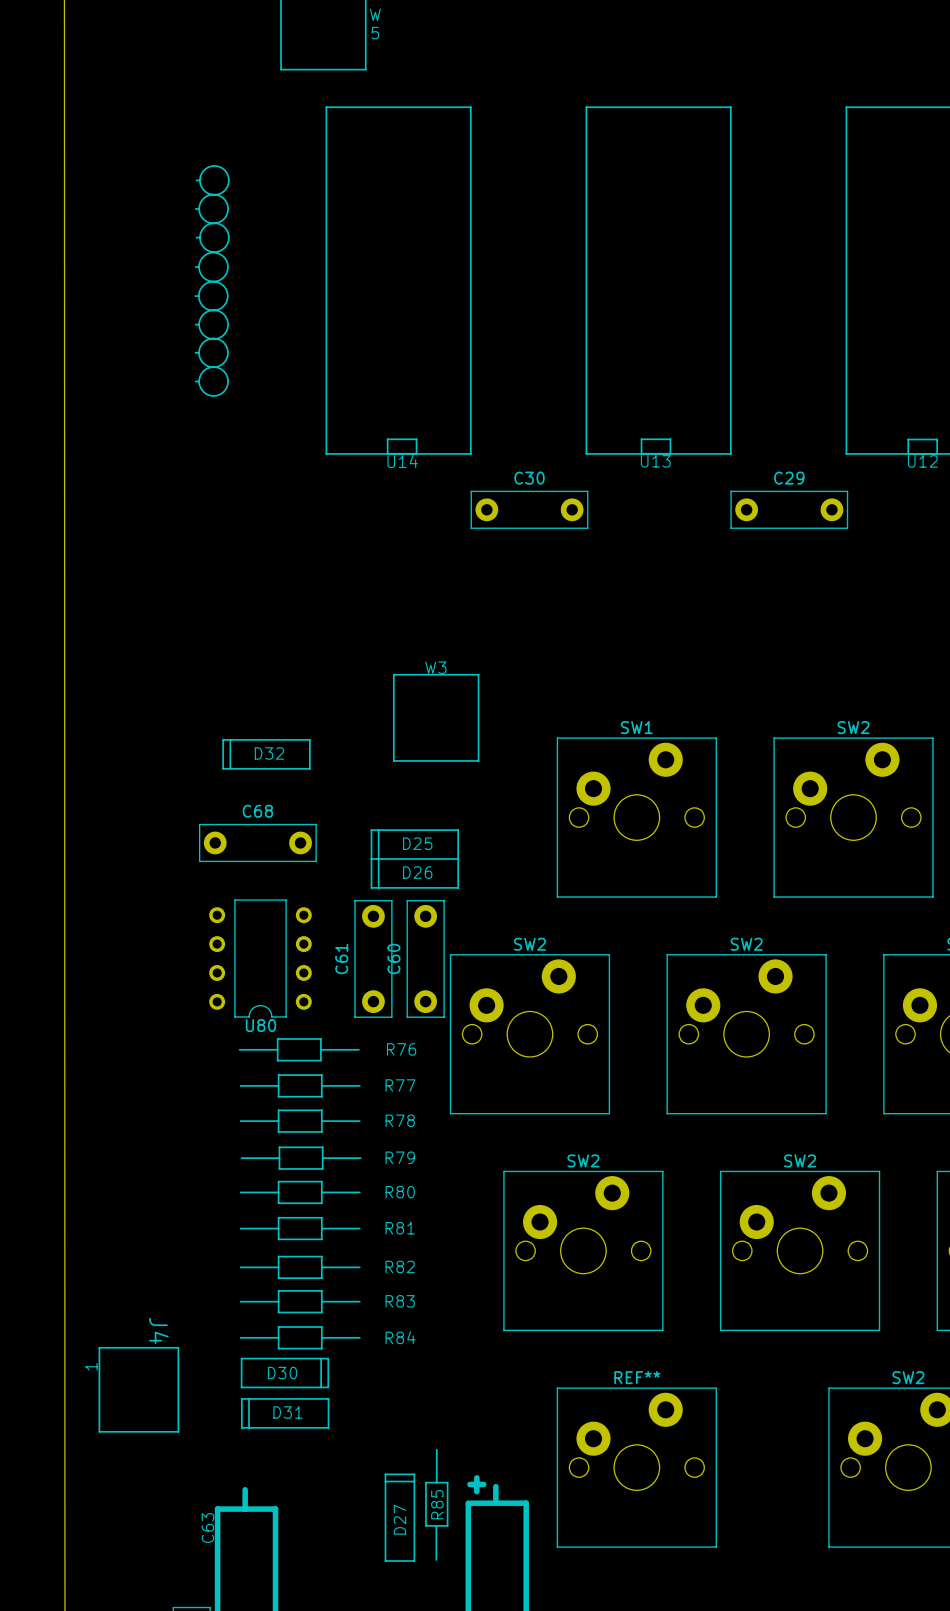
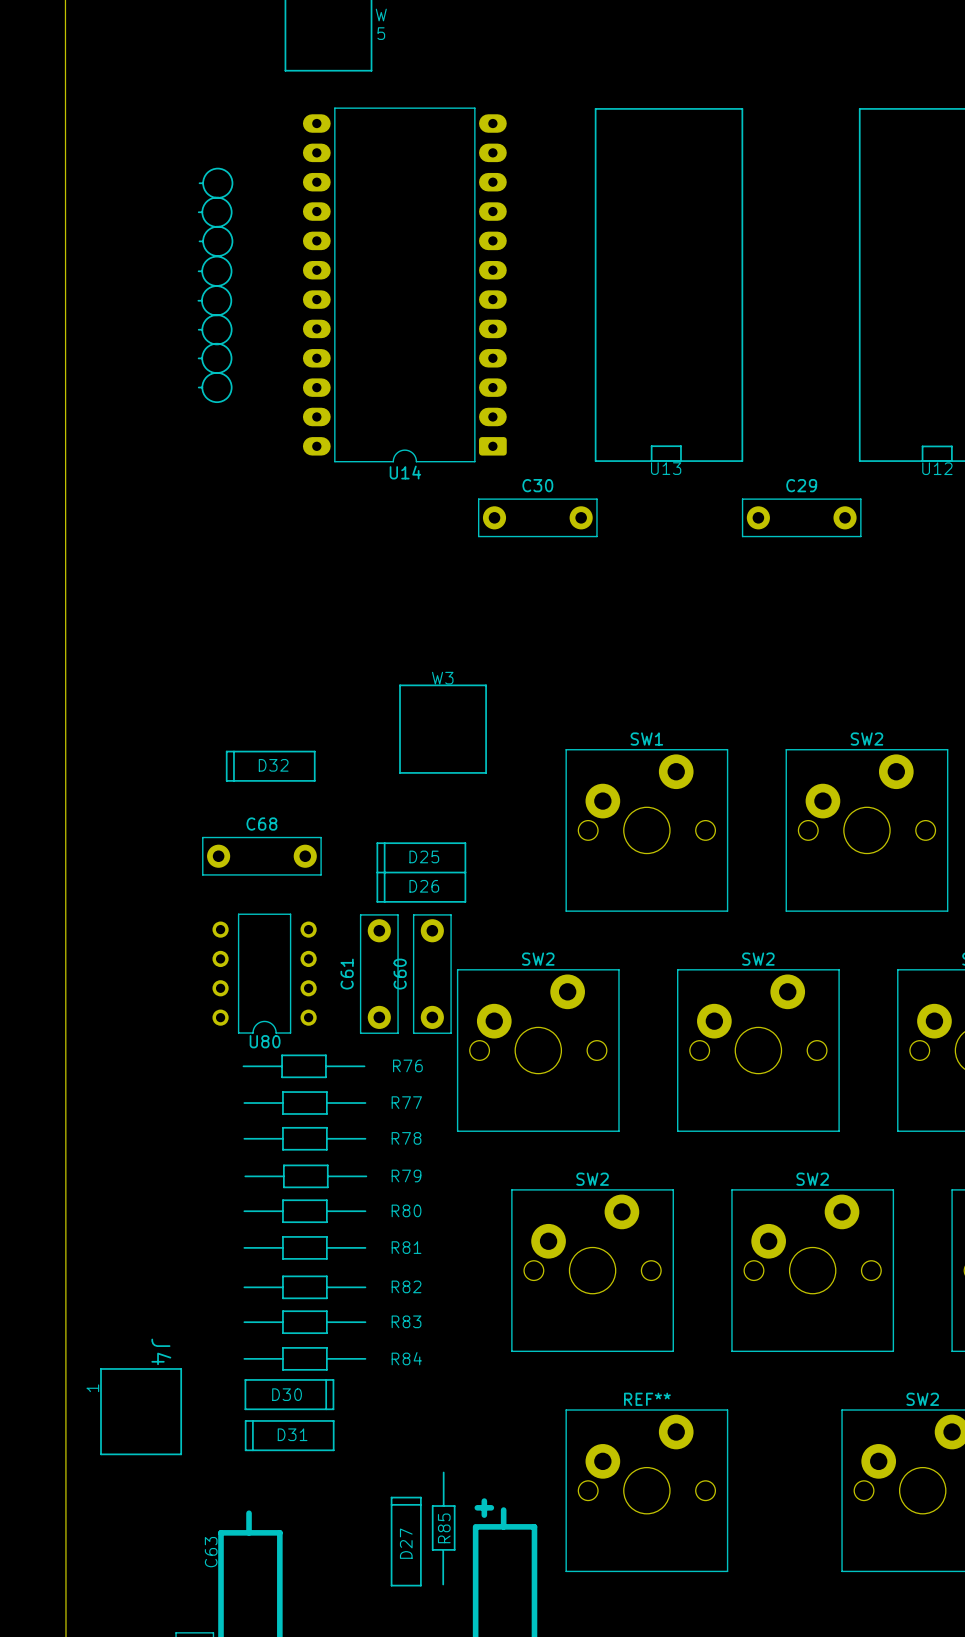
line: (326, 107) (326, 453) (470, 453) (470, 107) (326, 107) -> none
U14: none -> (404, 284)
line: (387, 439) (387, 453) (416, 453) (416, 439) (387, 439) -> none
text: U14 (402, 461) -> none

